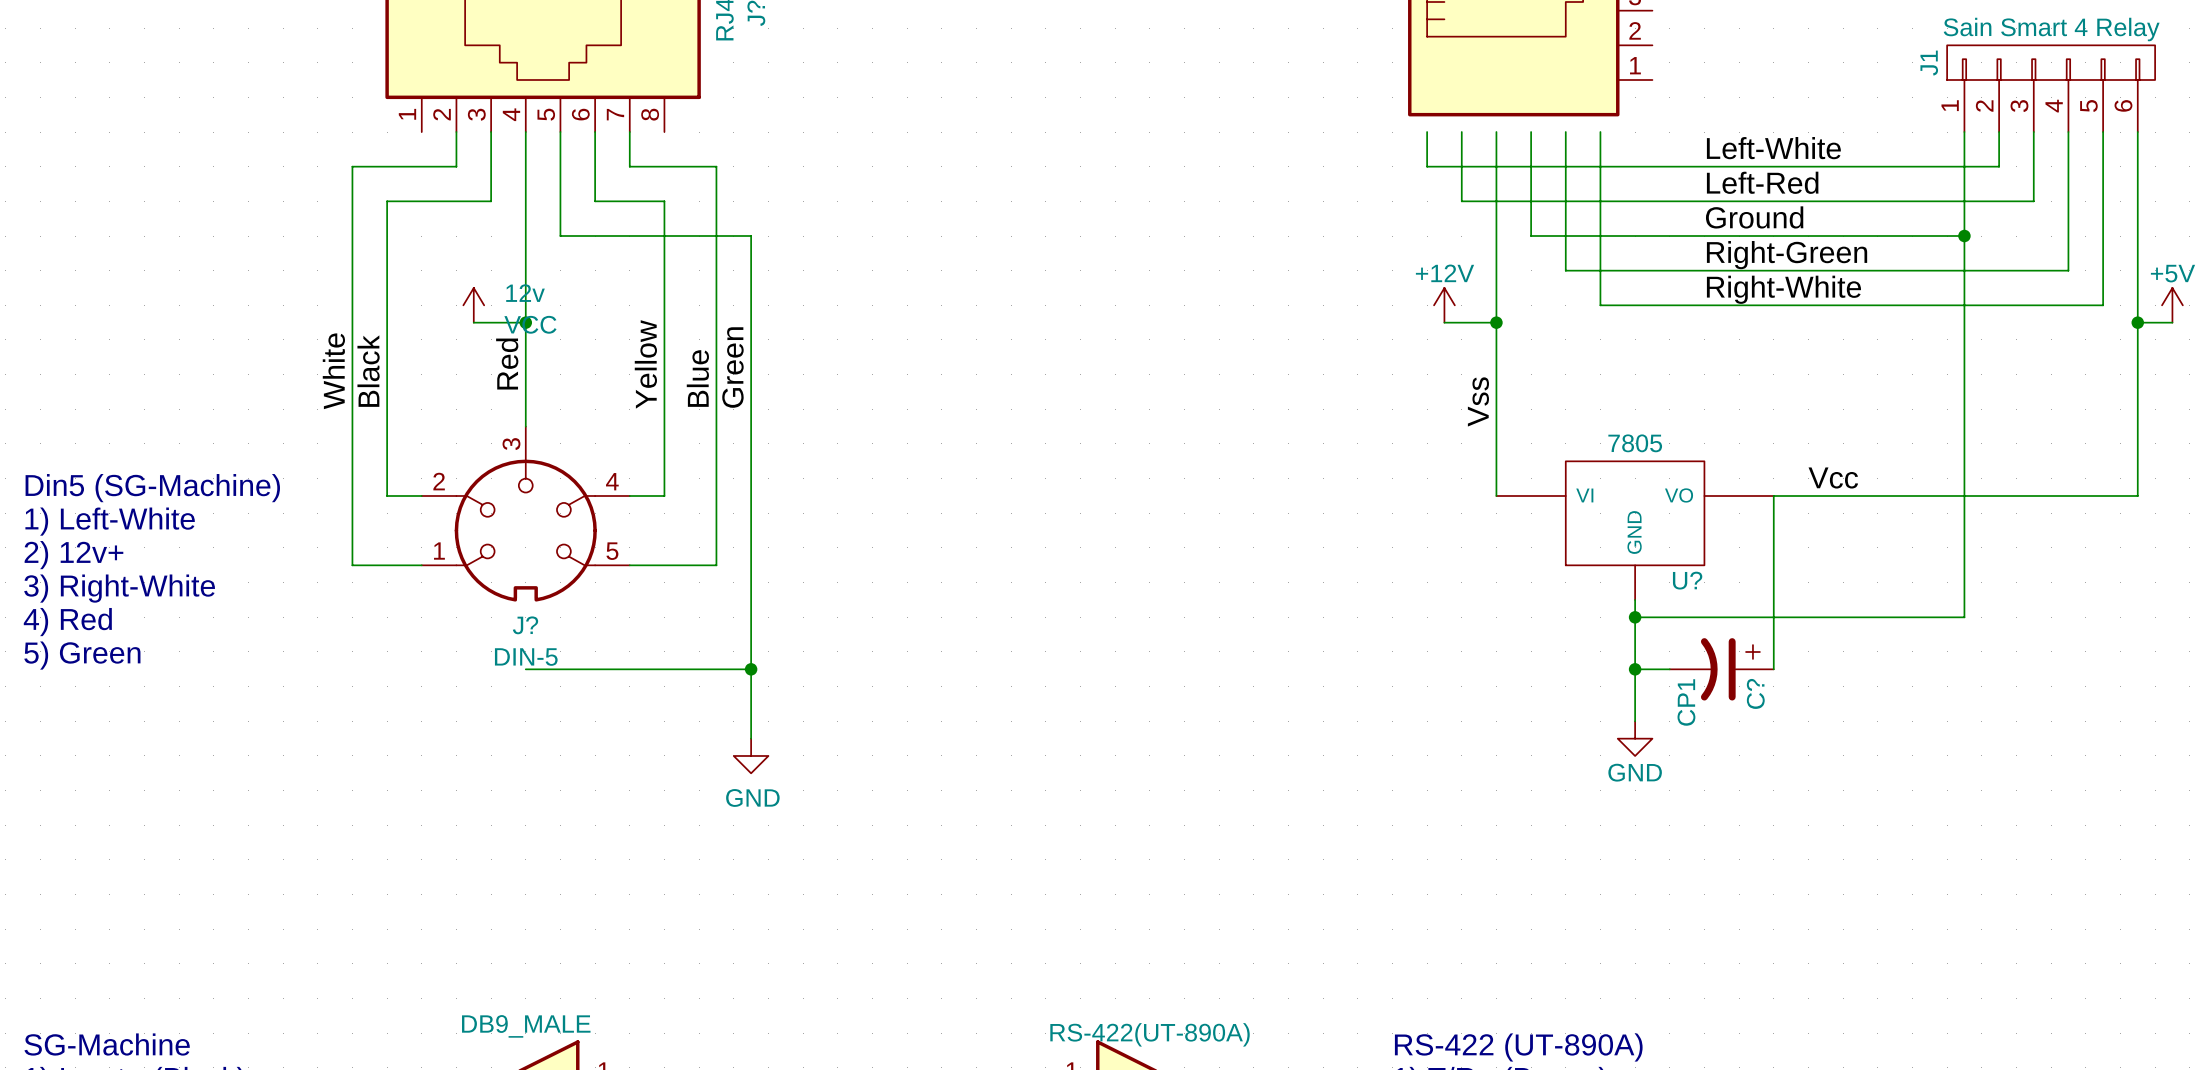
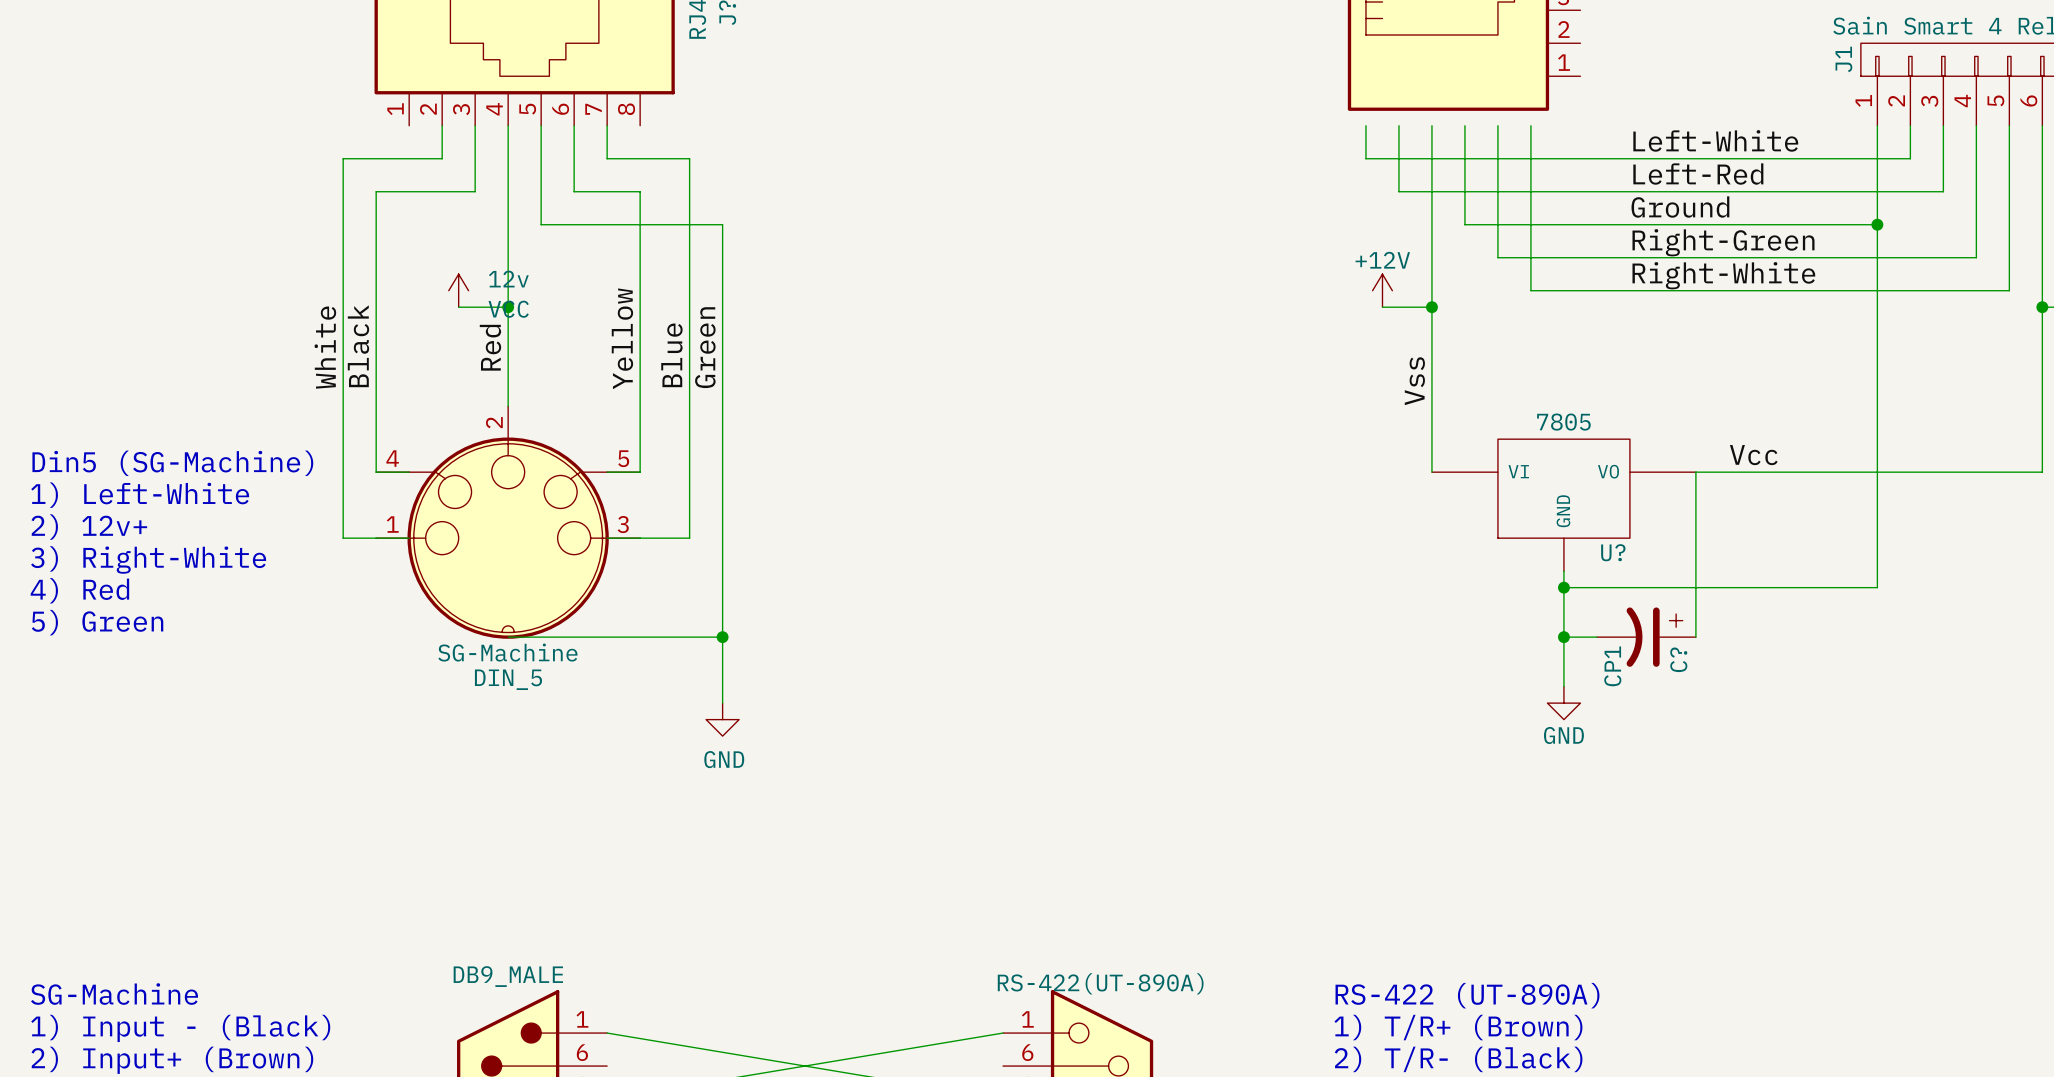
J?: DIN-5 (525, 514) -> none
SG-Machine: none -> DIN_5 (508, 522)

